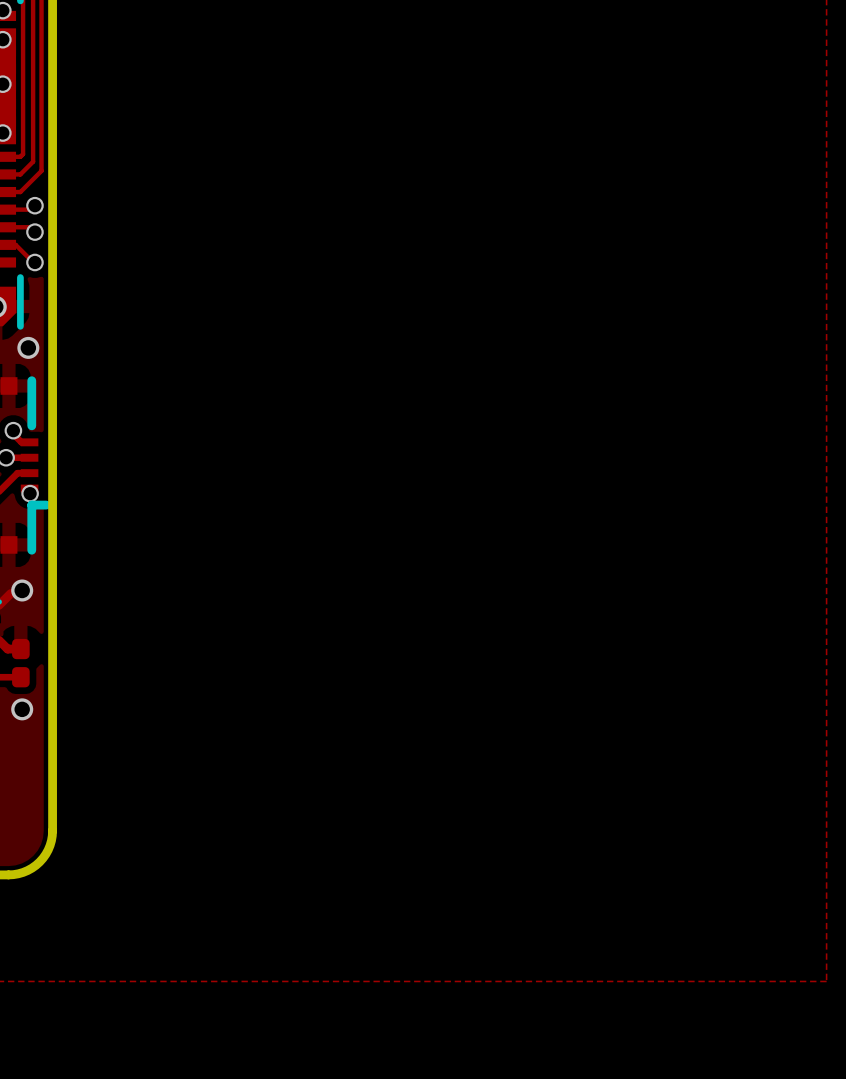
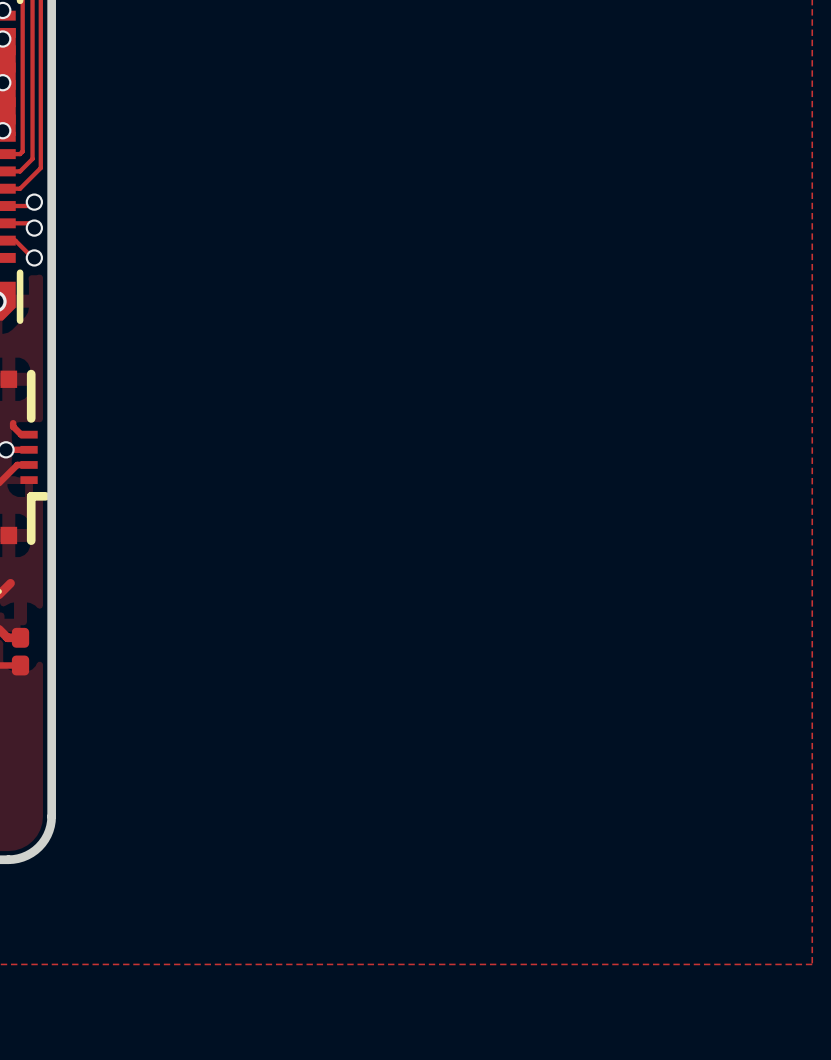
via: (28, 347) -> none
via: (13, 430) -> none
via: (30, 493) -> none
via: (22, 590) -> none
via: (22, 709) -> none

